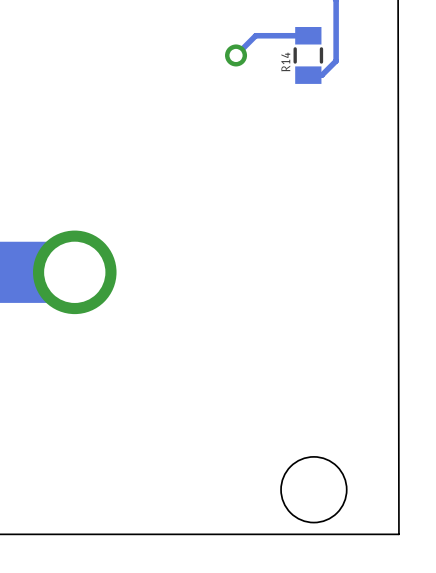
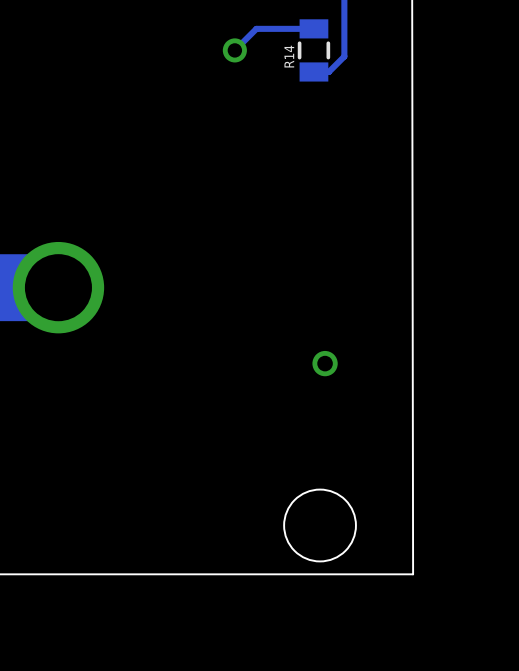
via: none -> (325, 363)

